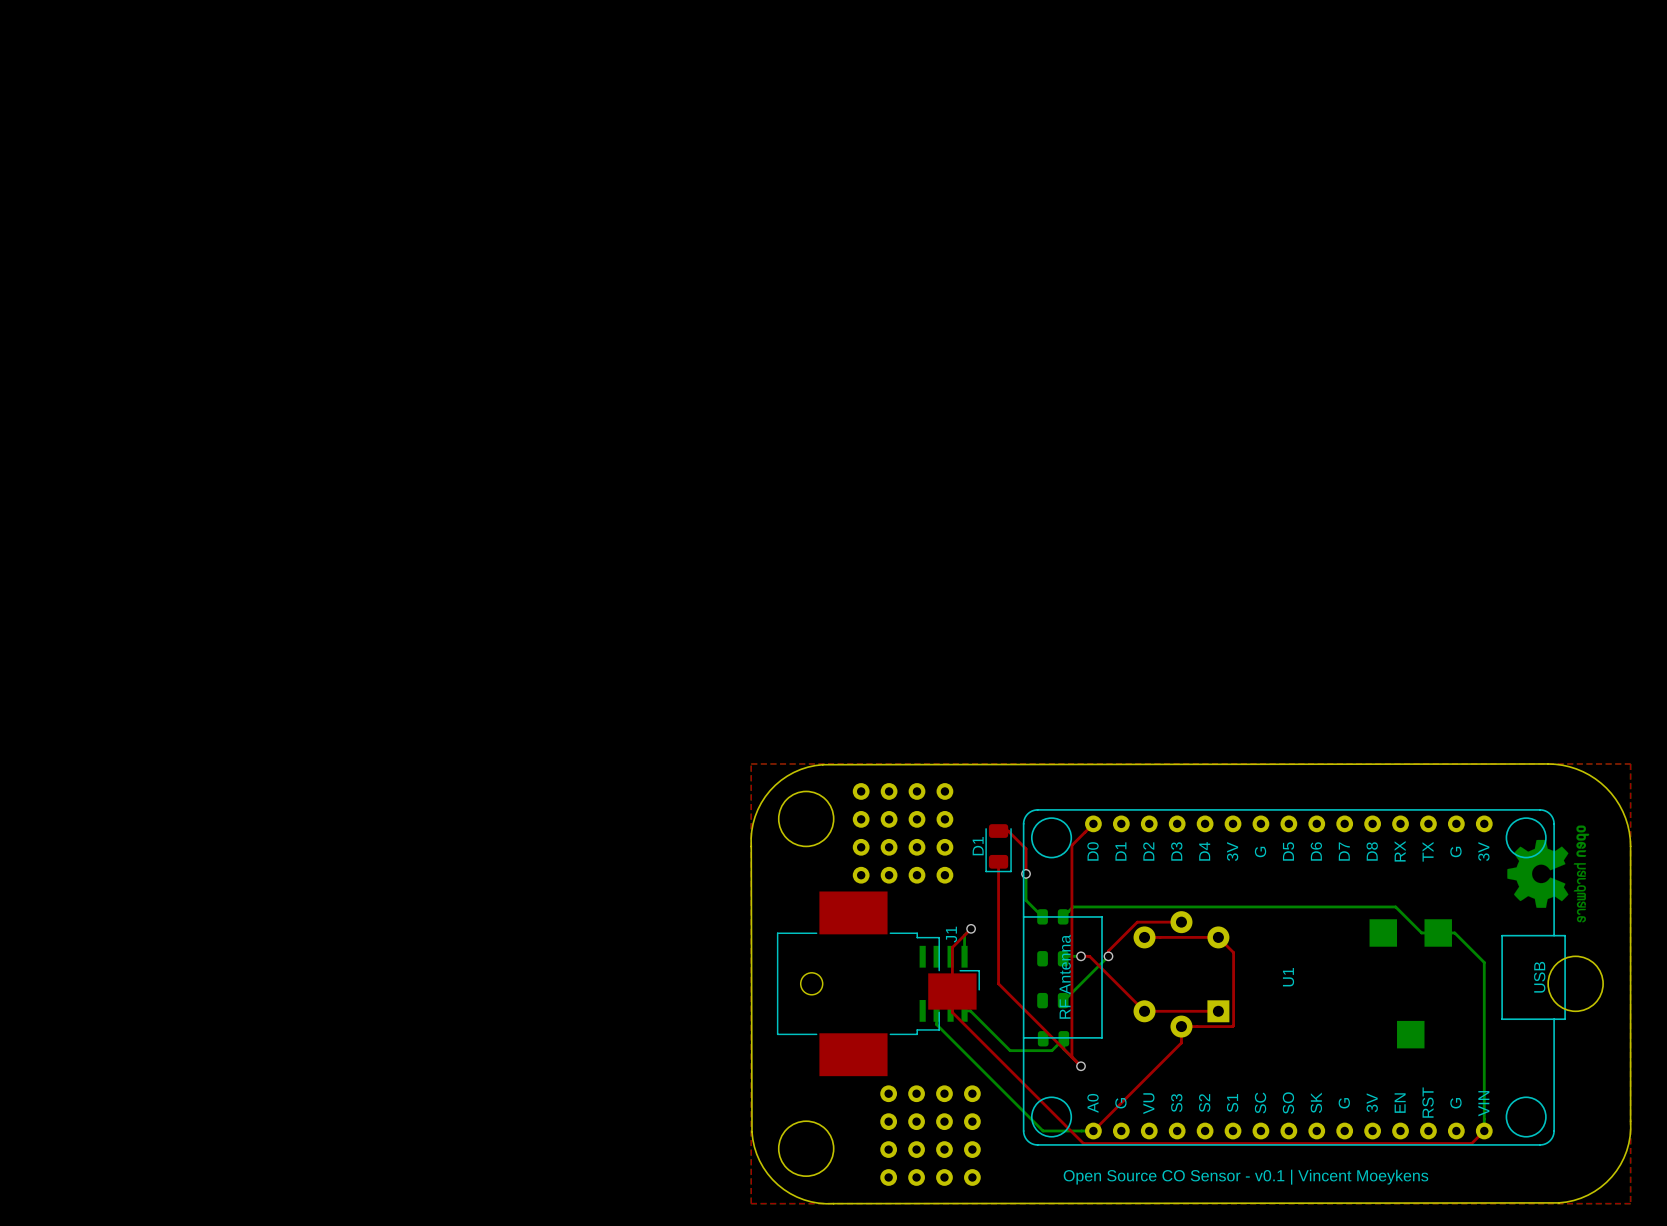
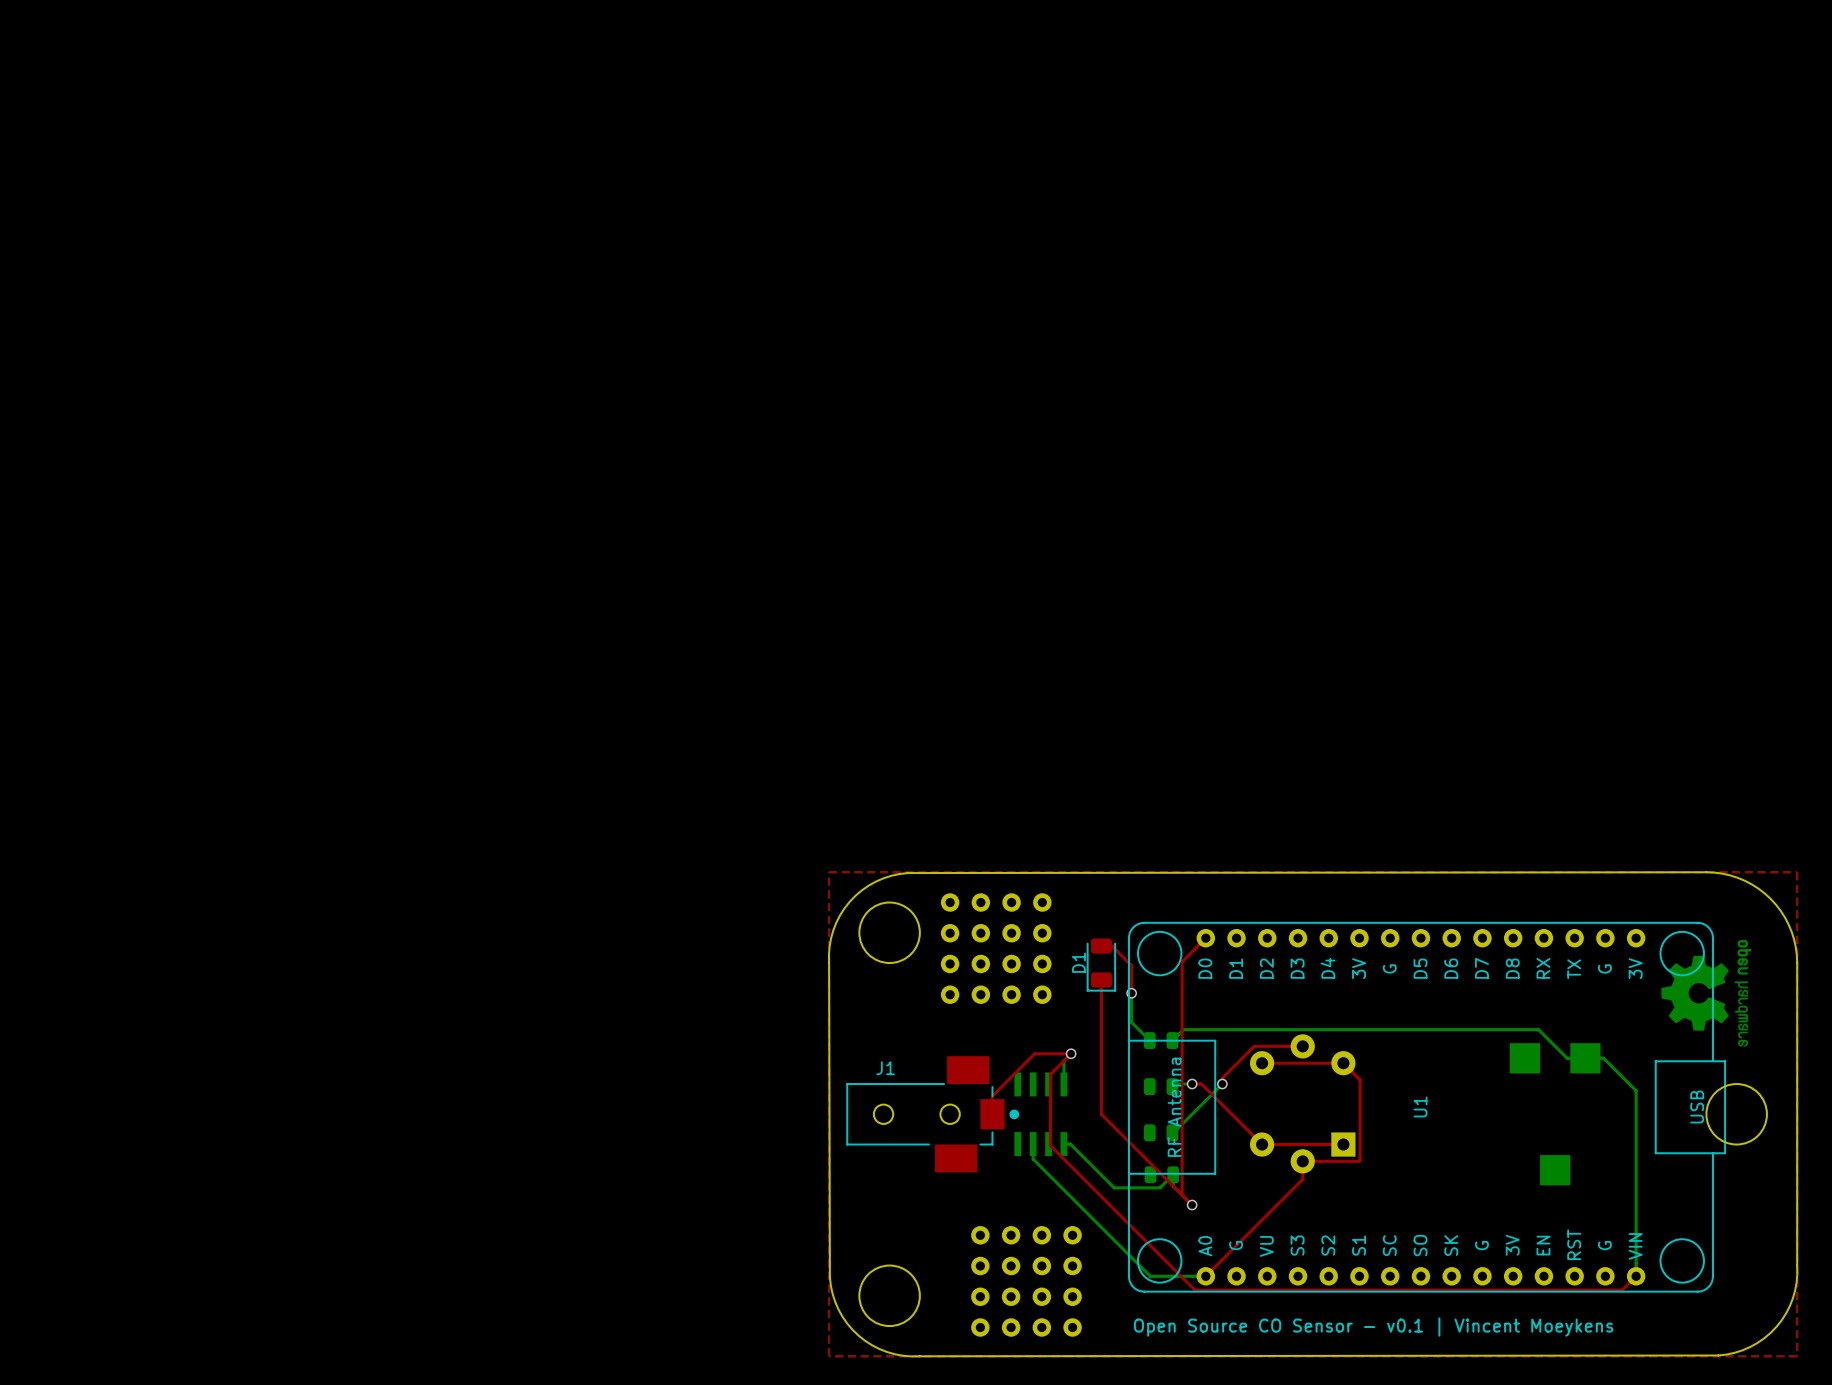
J1 footprint: [776, 891, 980, 1077] -> [846, 1056, 1020, 1173]
top track: none -> (1071, 1053) (1034, 1053) (992, 1096) (992, 1114)
J1 name position: J1 (951, 934) -> J1 (885, 1068)

